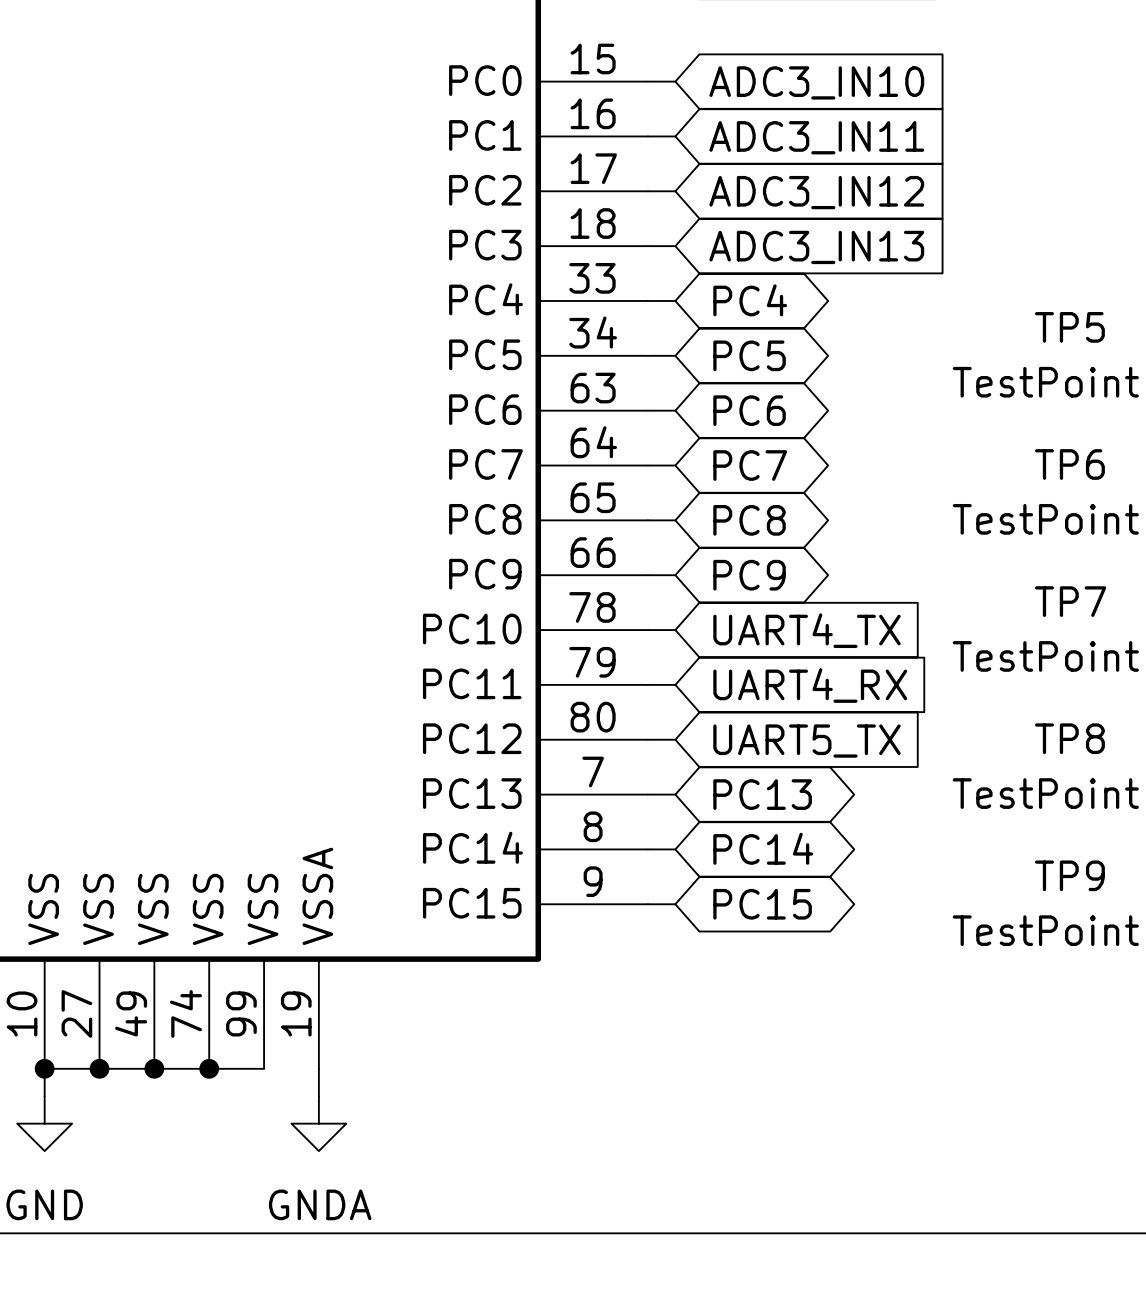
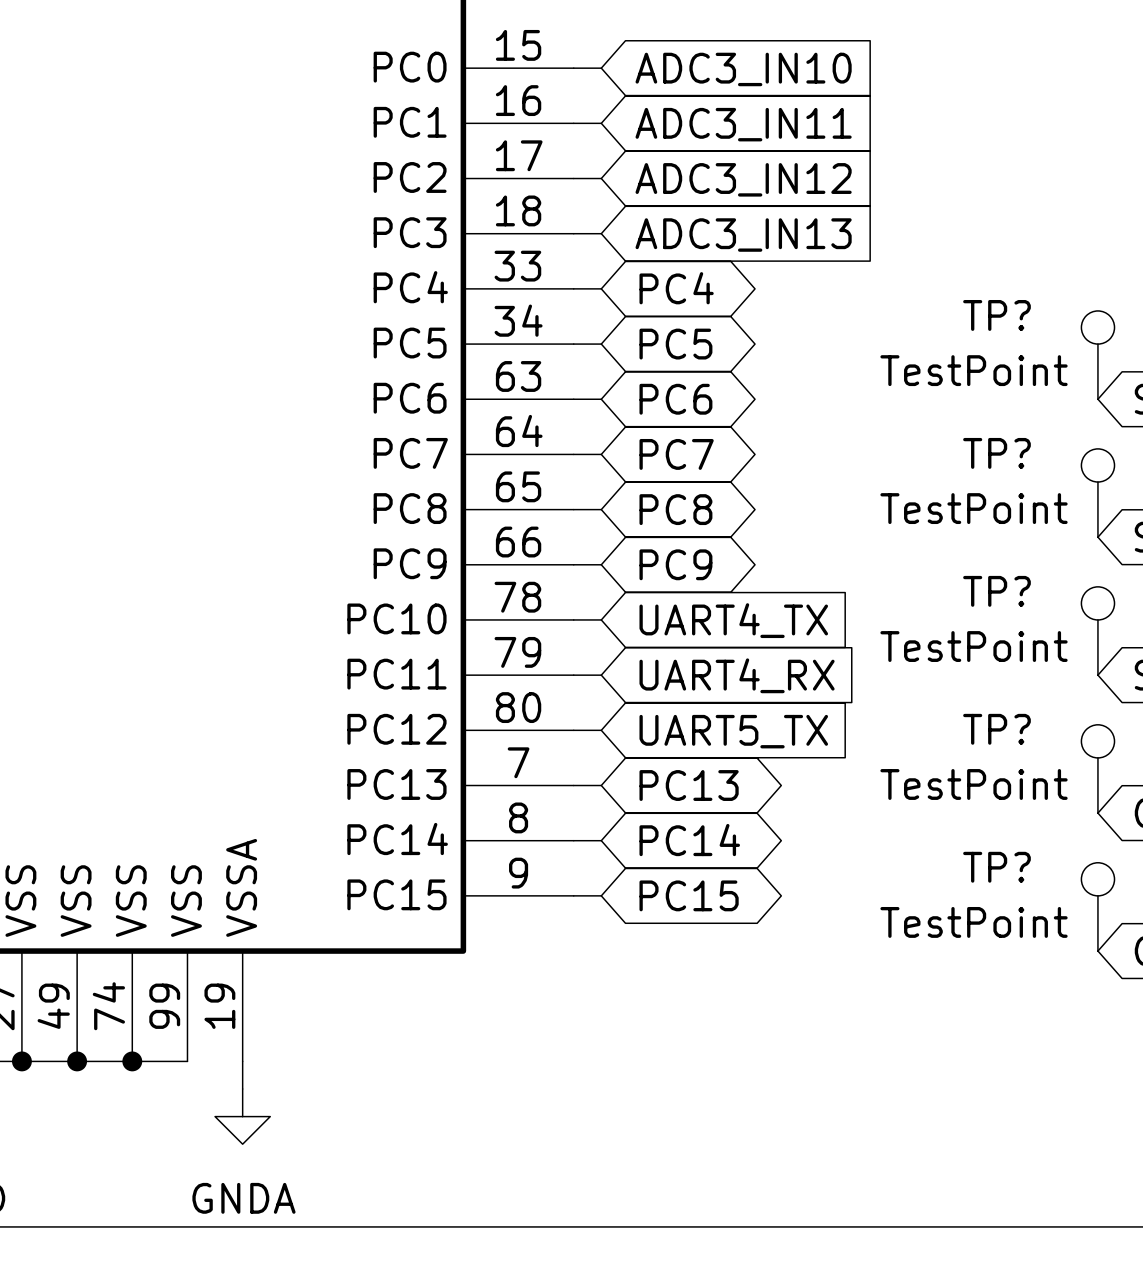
TP5 name: TP5 (1069, 327) -> TP? (997, 315)
TP6 name: TP6 (1069, 464) -> TP? (997, 453)
TP7 name: TP7 (1070, 601) -> TP? (997, 591)
TP8 name: TP8 (1069, 738) -> TP? (997, 729)
TP9 name: TP9 (1069, 875) -> TP? (997, 867)

